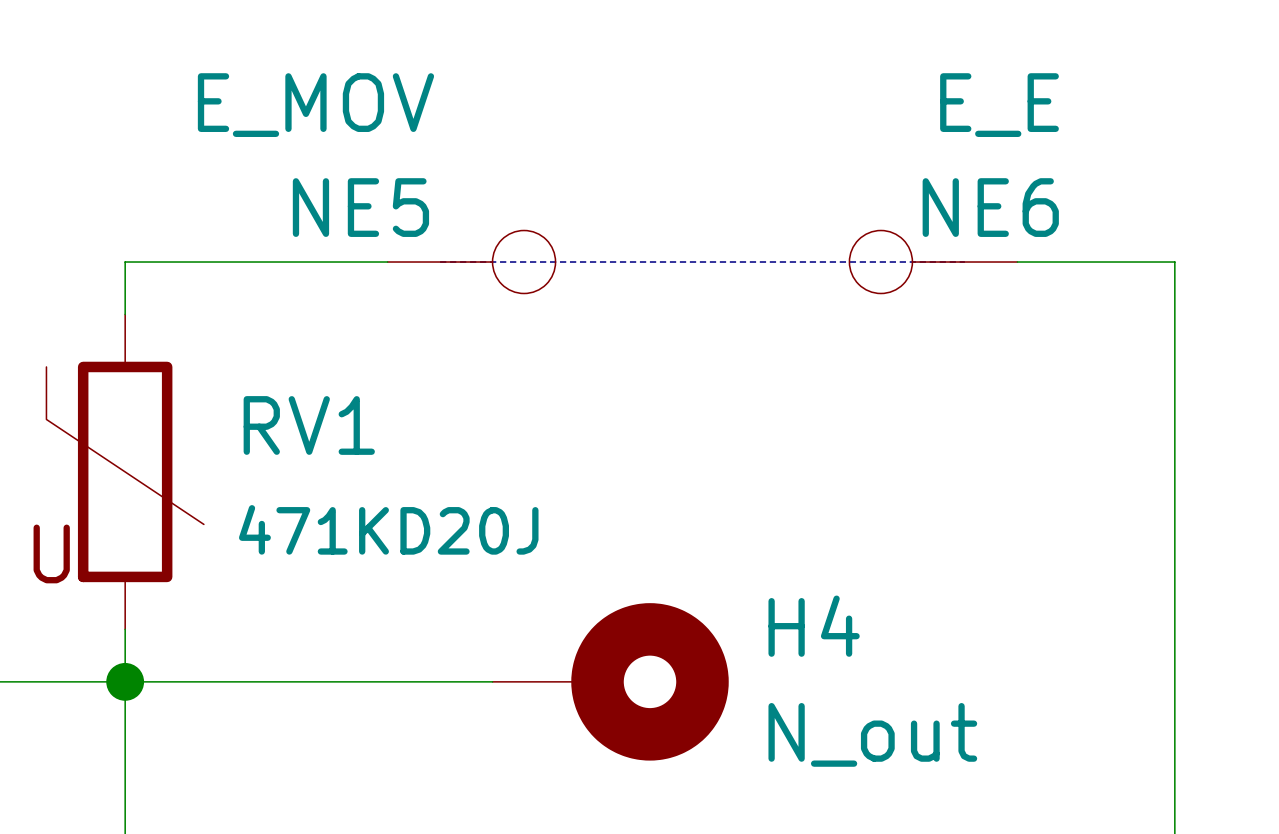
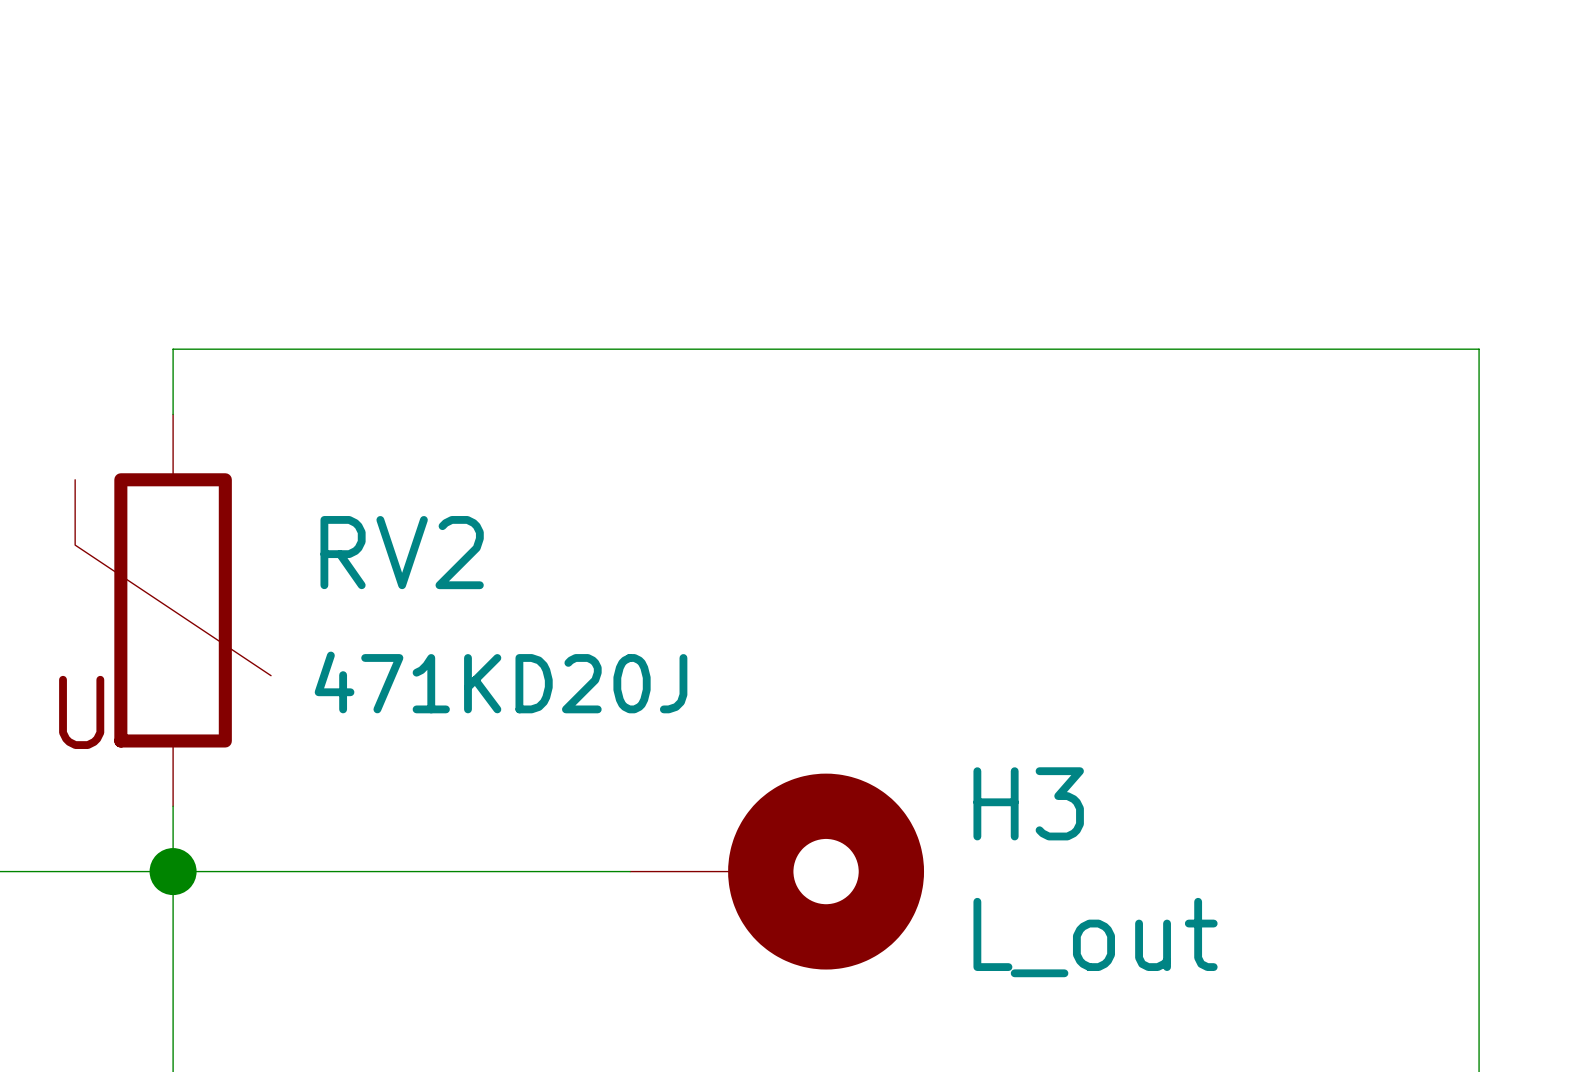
line: (440, 262) (964, 262) -> none
NE5: E_MOV (471, 262) -> none
NE6: E_E (933, 262) -> none
RV1 name: RV1 (309, 425) -> RV2 (402, 552)
H4 name: H4 (814, 626) -> H3 (1028, 803)
H4 value: N_out (872, 734) -> L_out (1095, 937)

